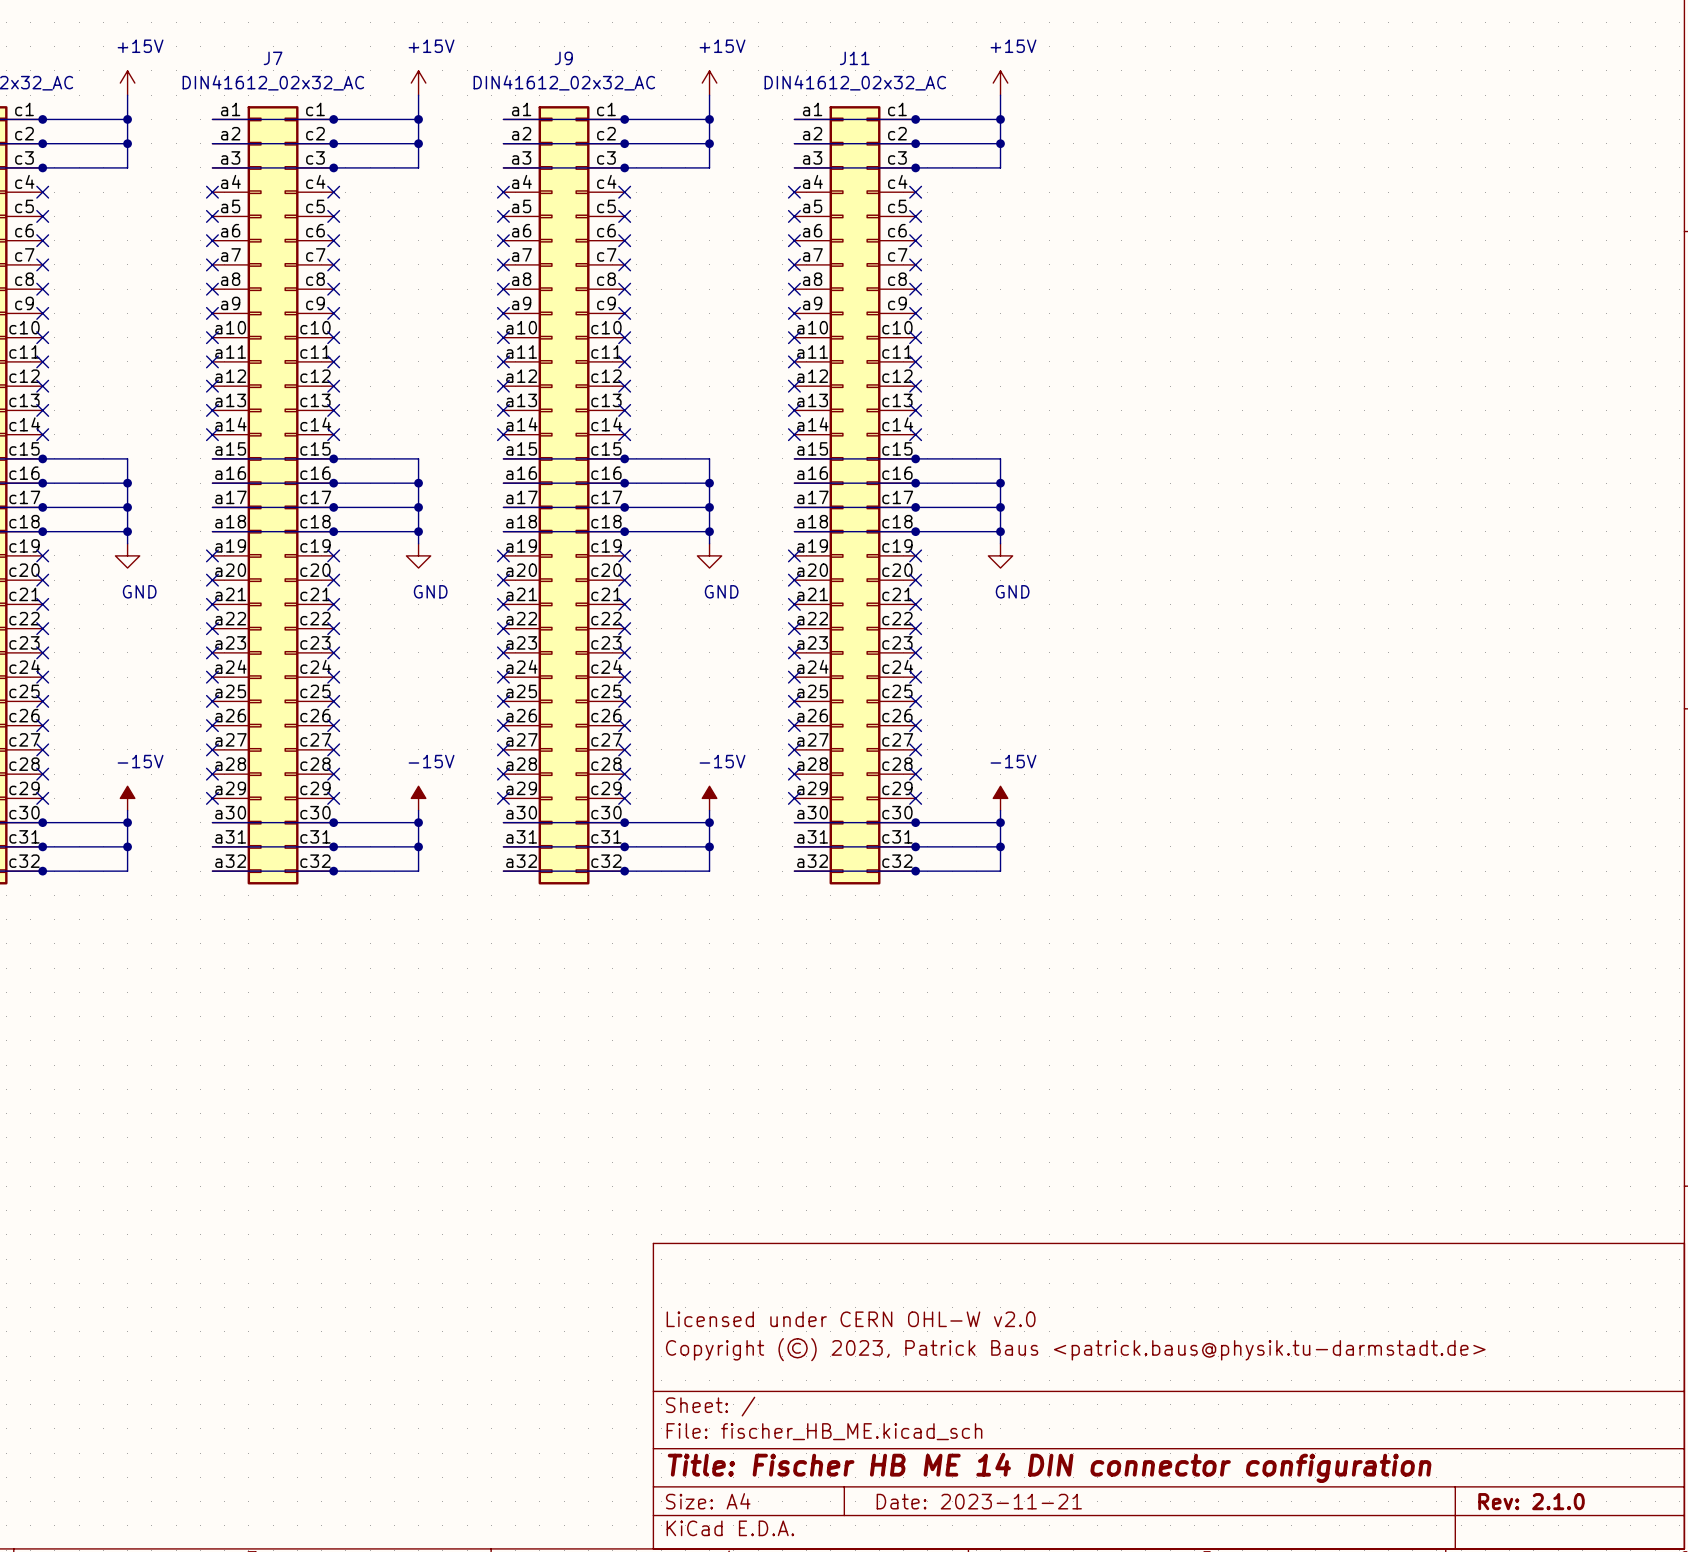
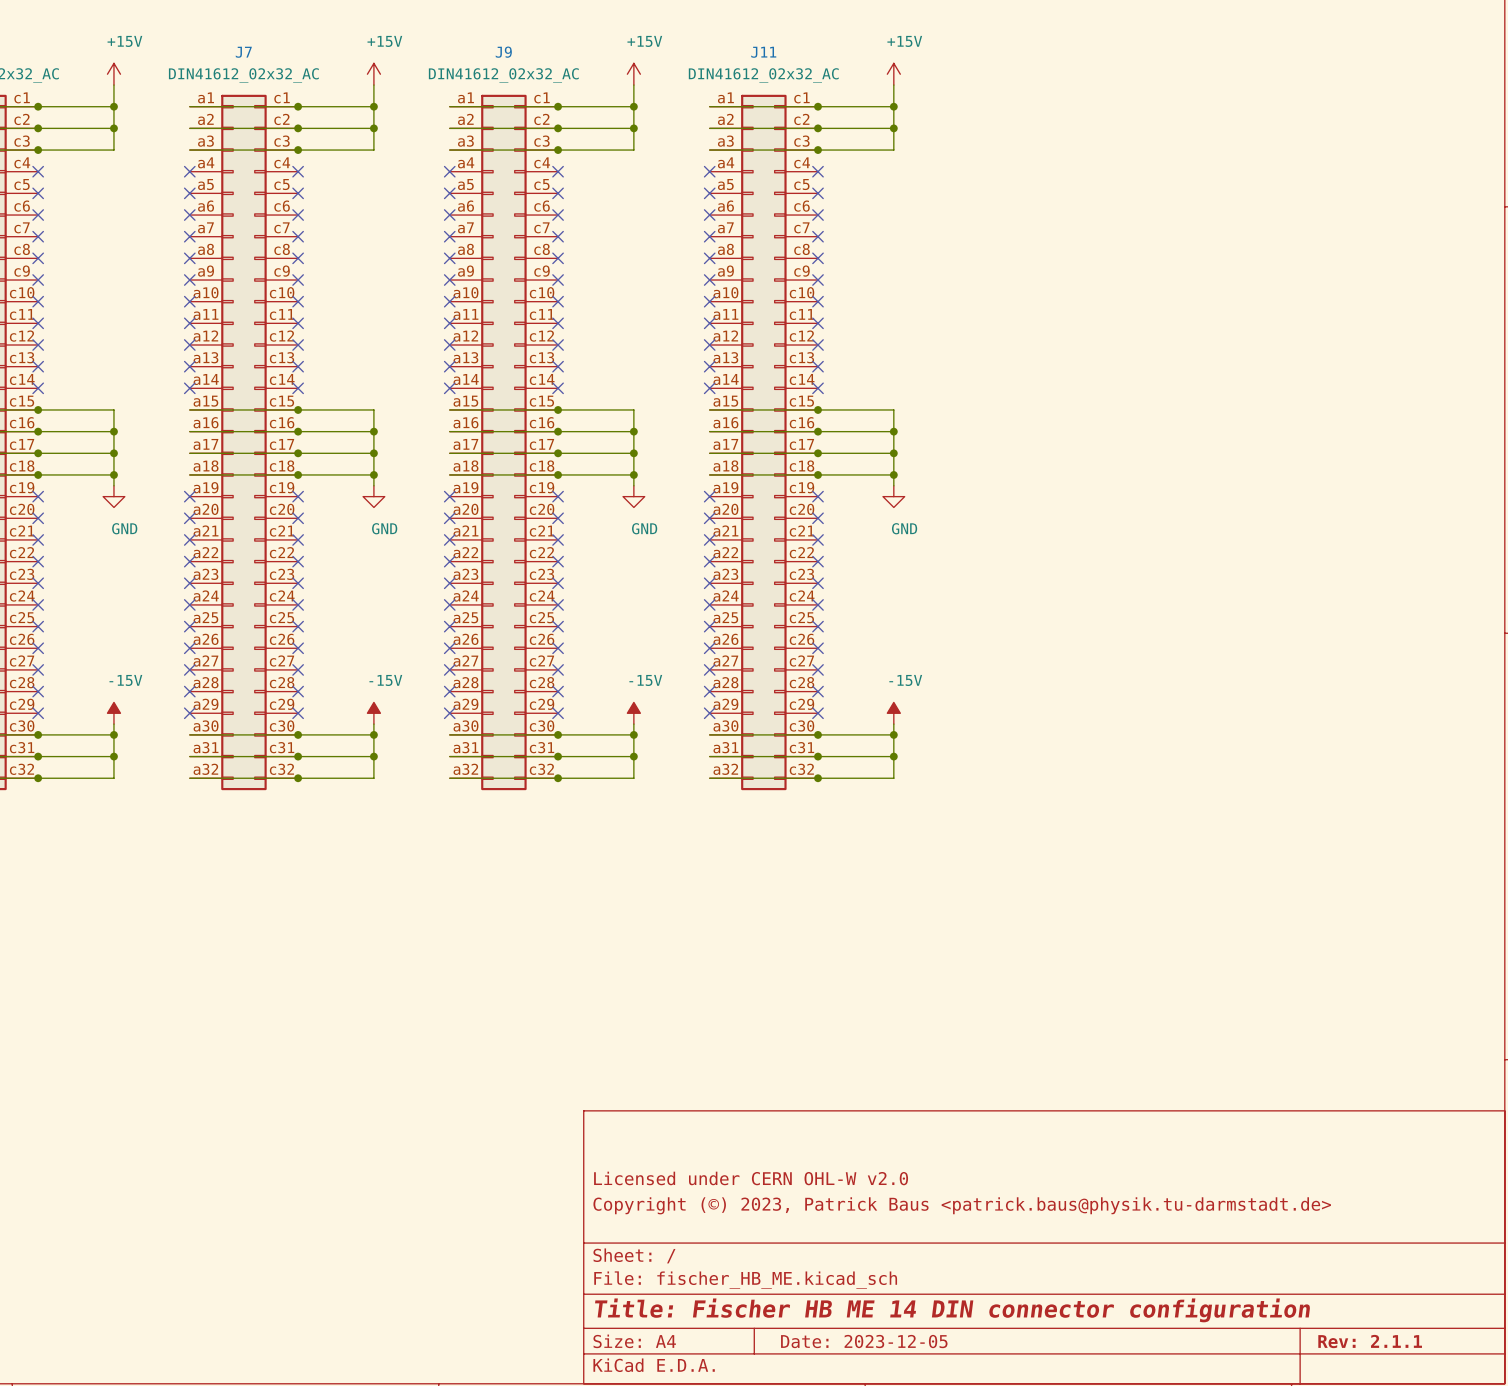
title block: Date: 2023-11-21 (979, 1501) -> Date: 2023-12-05 (864, 1341)
title block: Rev: 2.1.0 (1531, 1501) -> Rev: 2.1.1 (1370, 1341)

